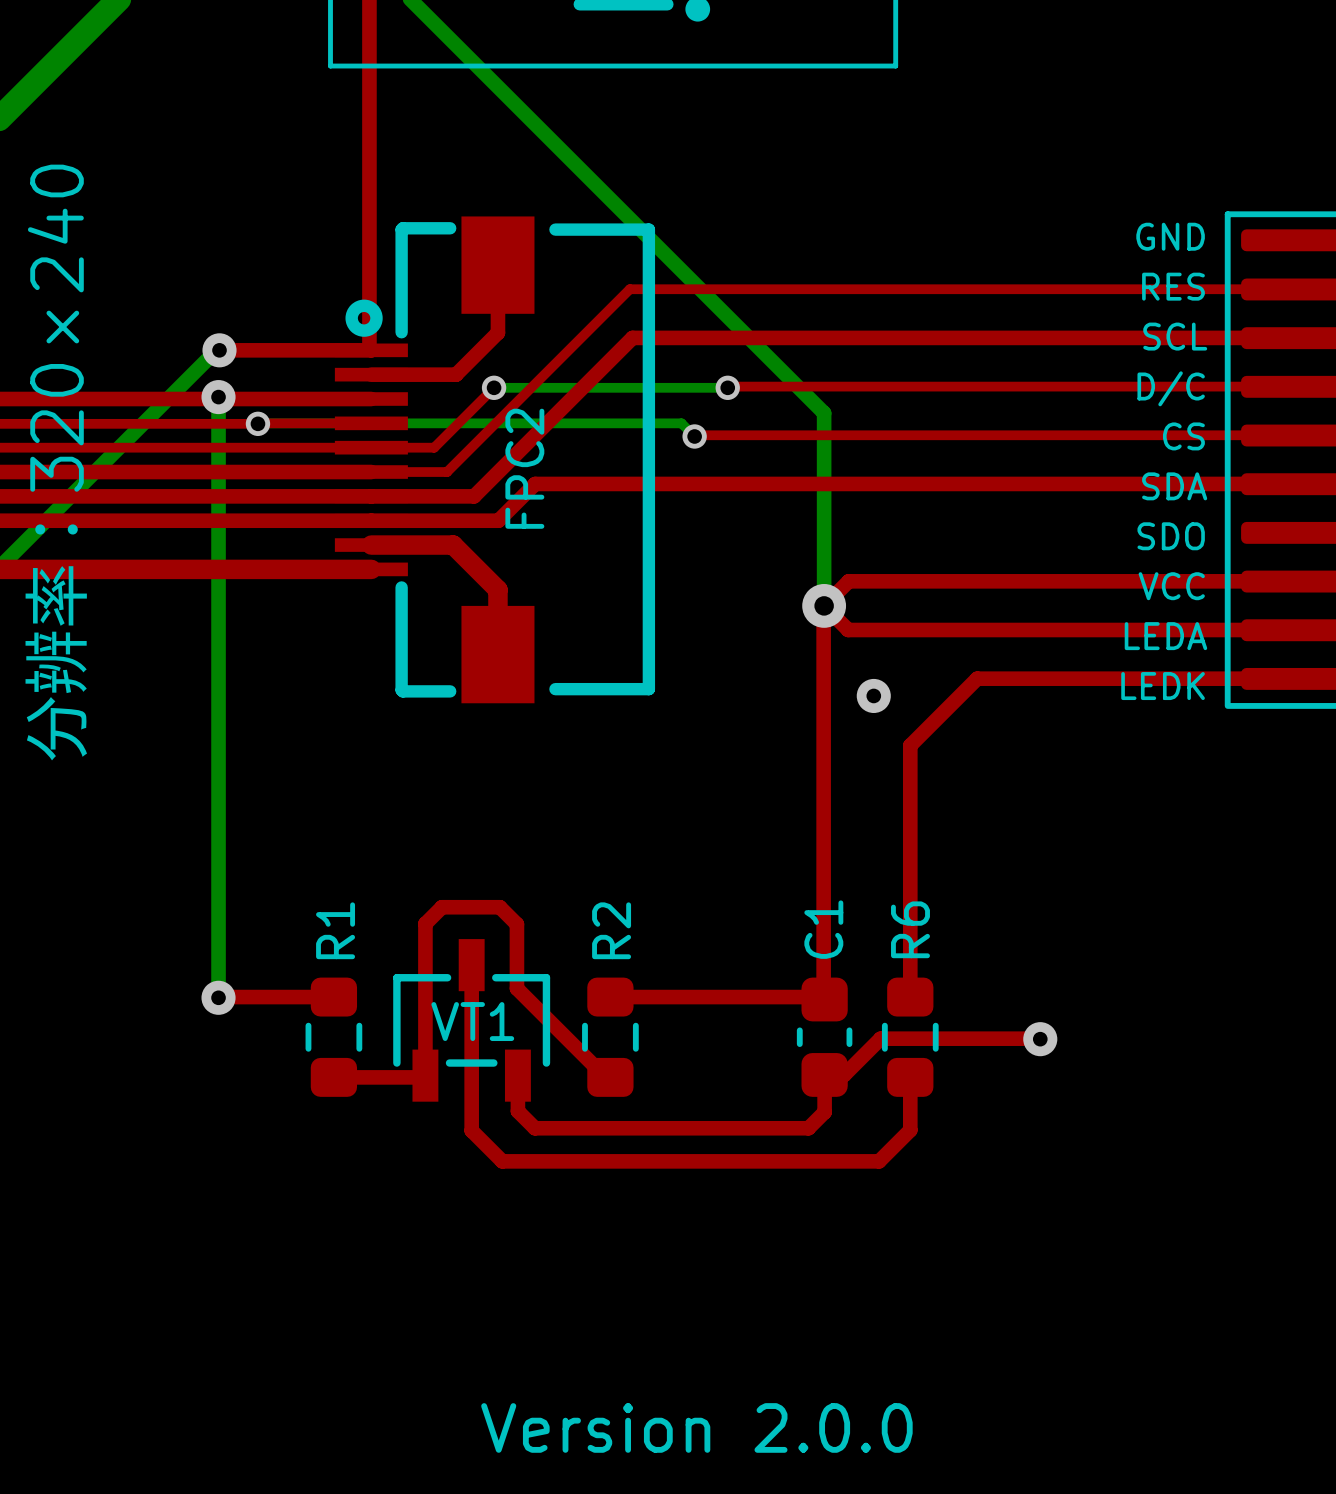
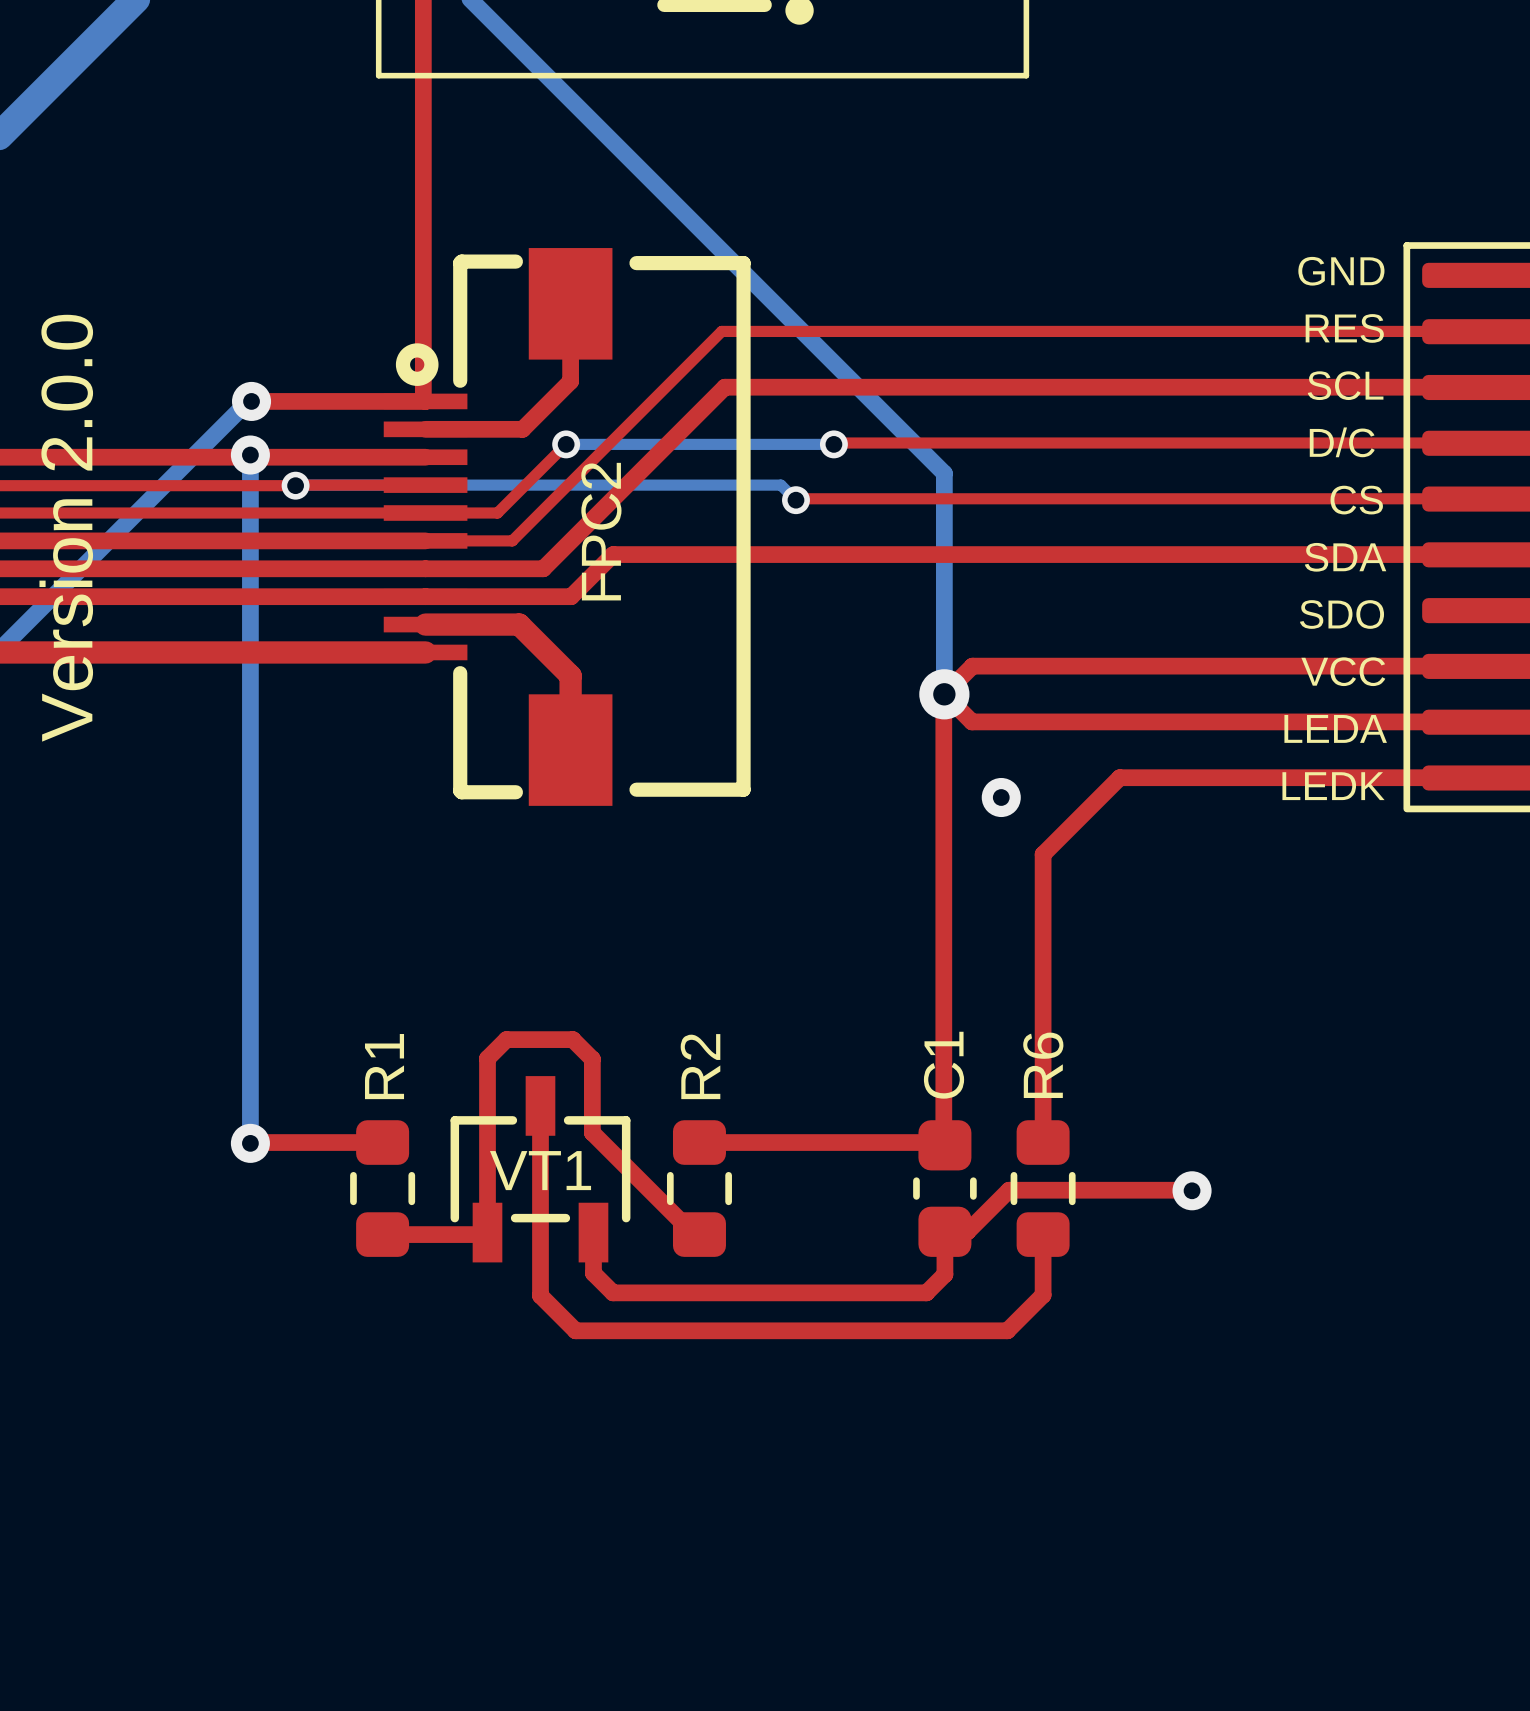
text: 分辨率：320×240 (56, 463) -> Version 2.0.0 (66, 528)
text: Version 2.0.0 (696, 1427) -> none

